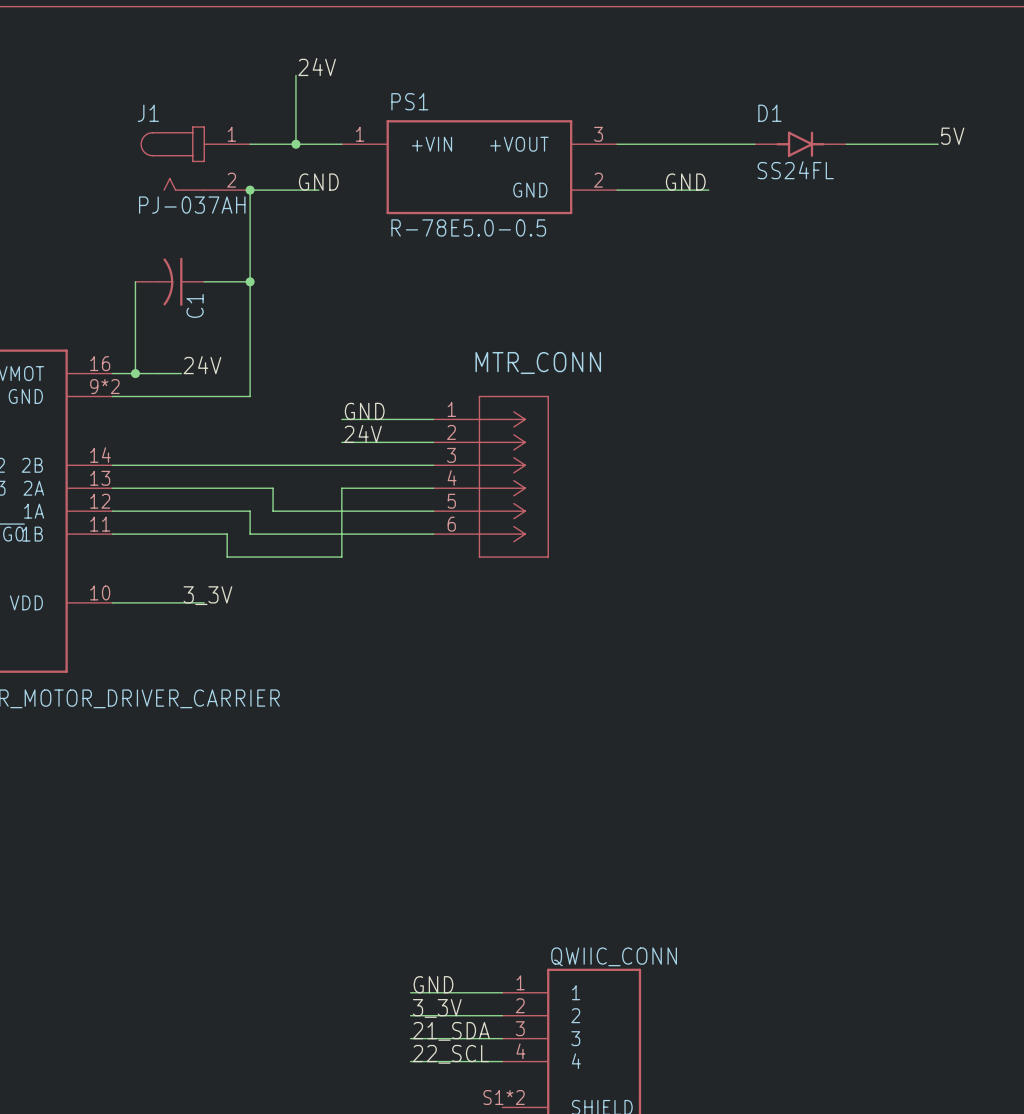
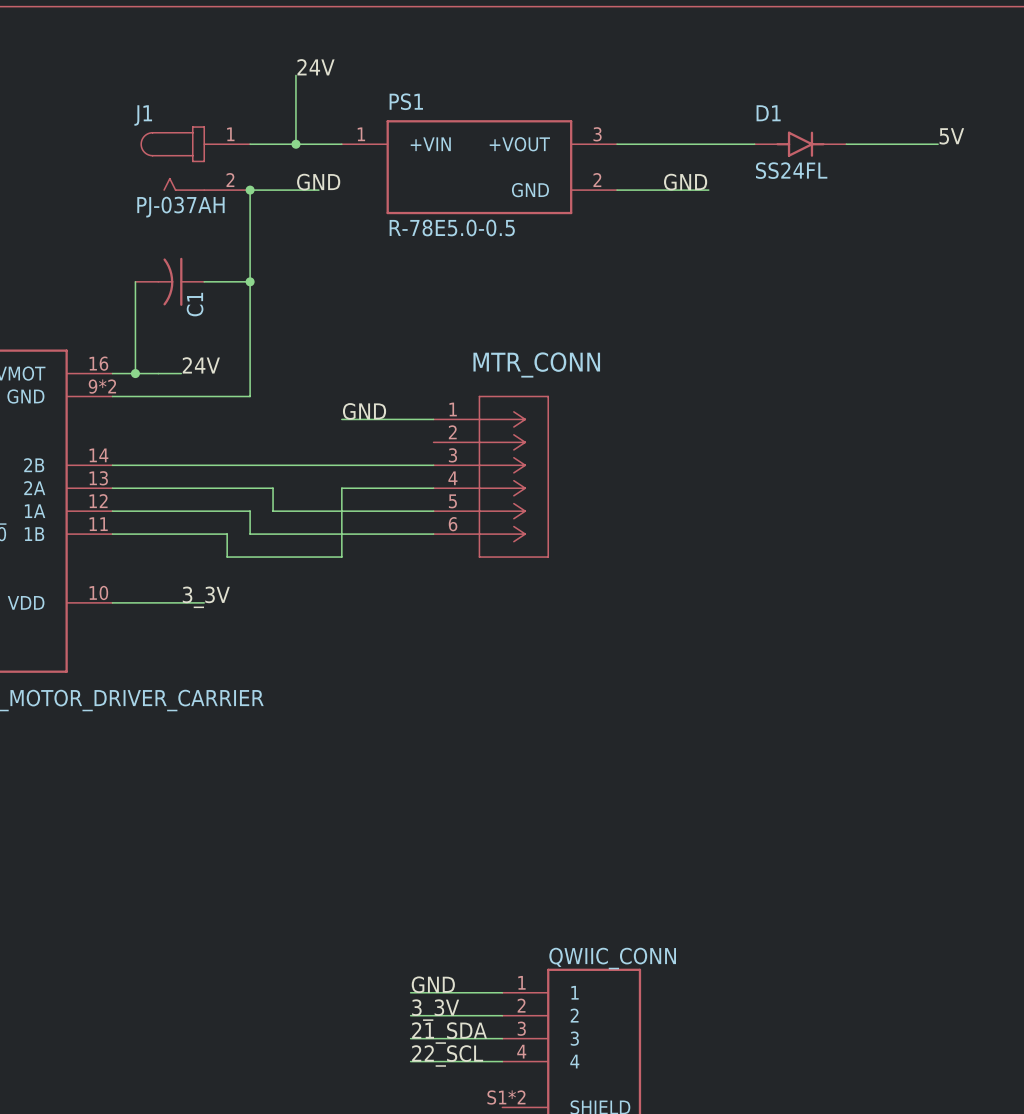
label: 24V (362, 433) -> none
wire: (341, 442) (433, 442) -> none

